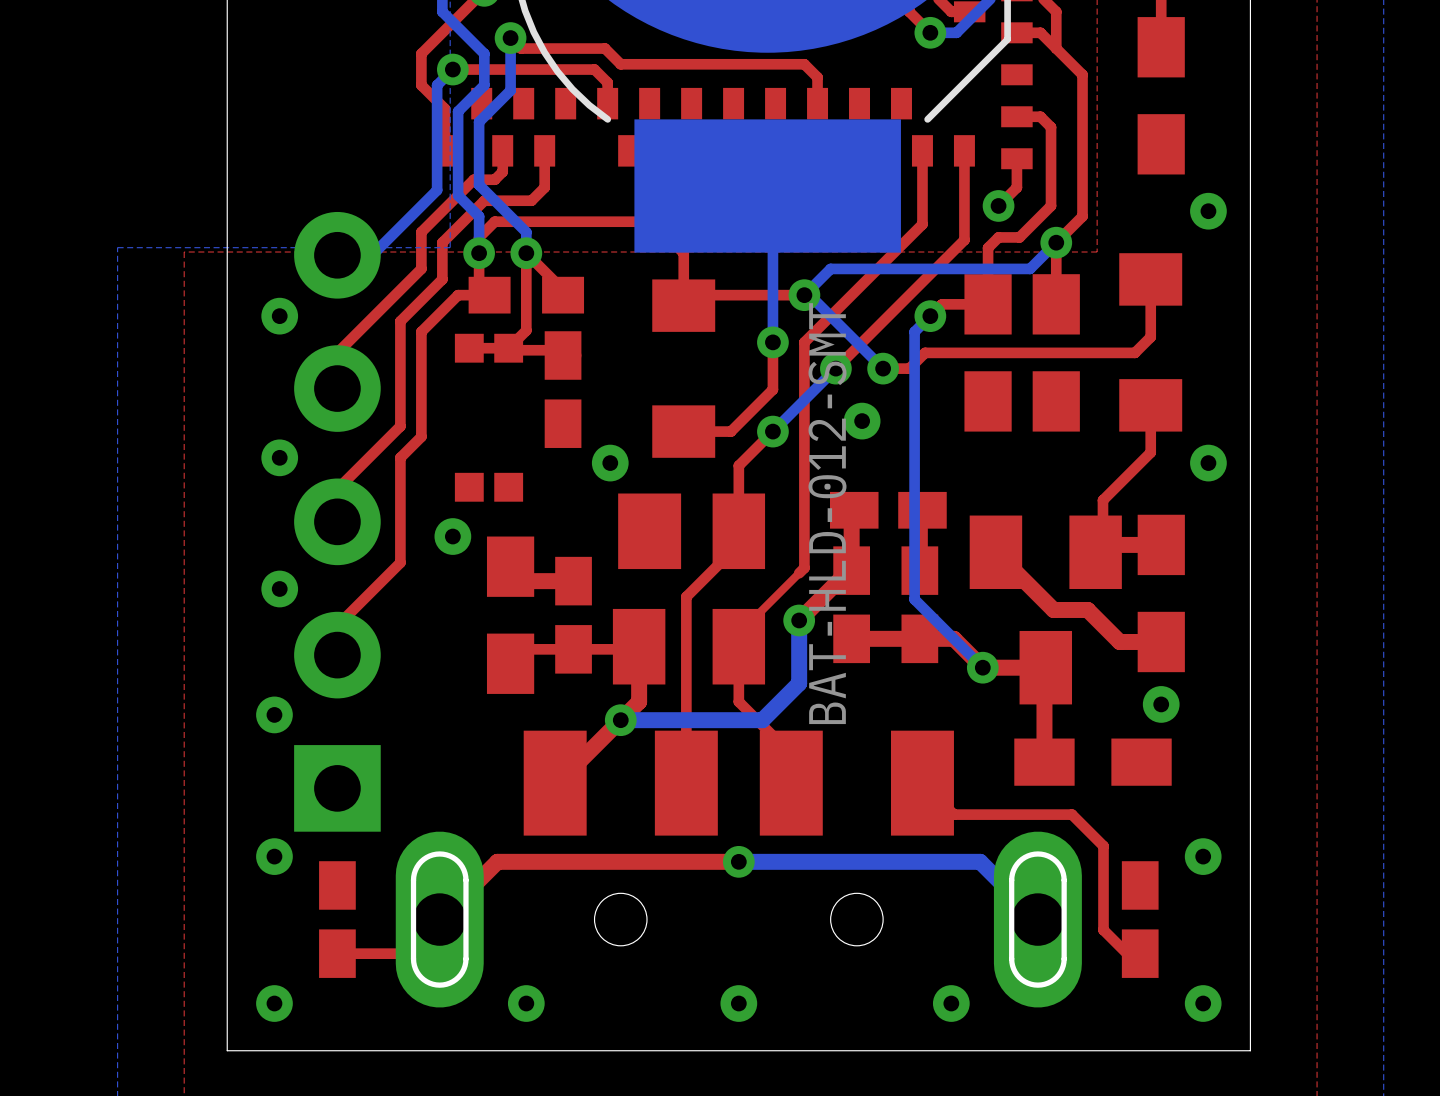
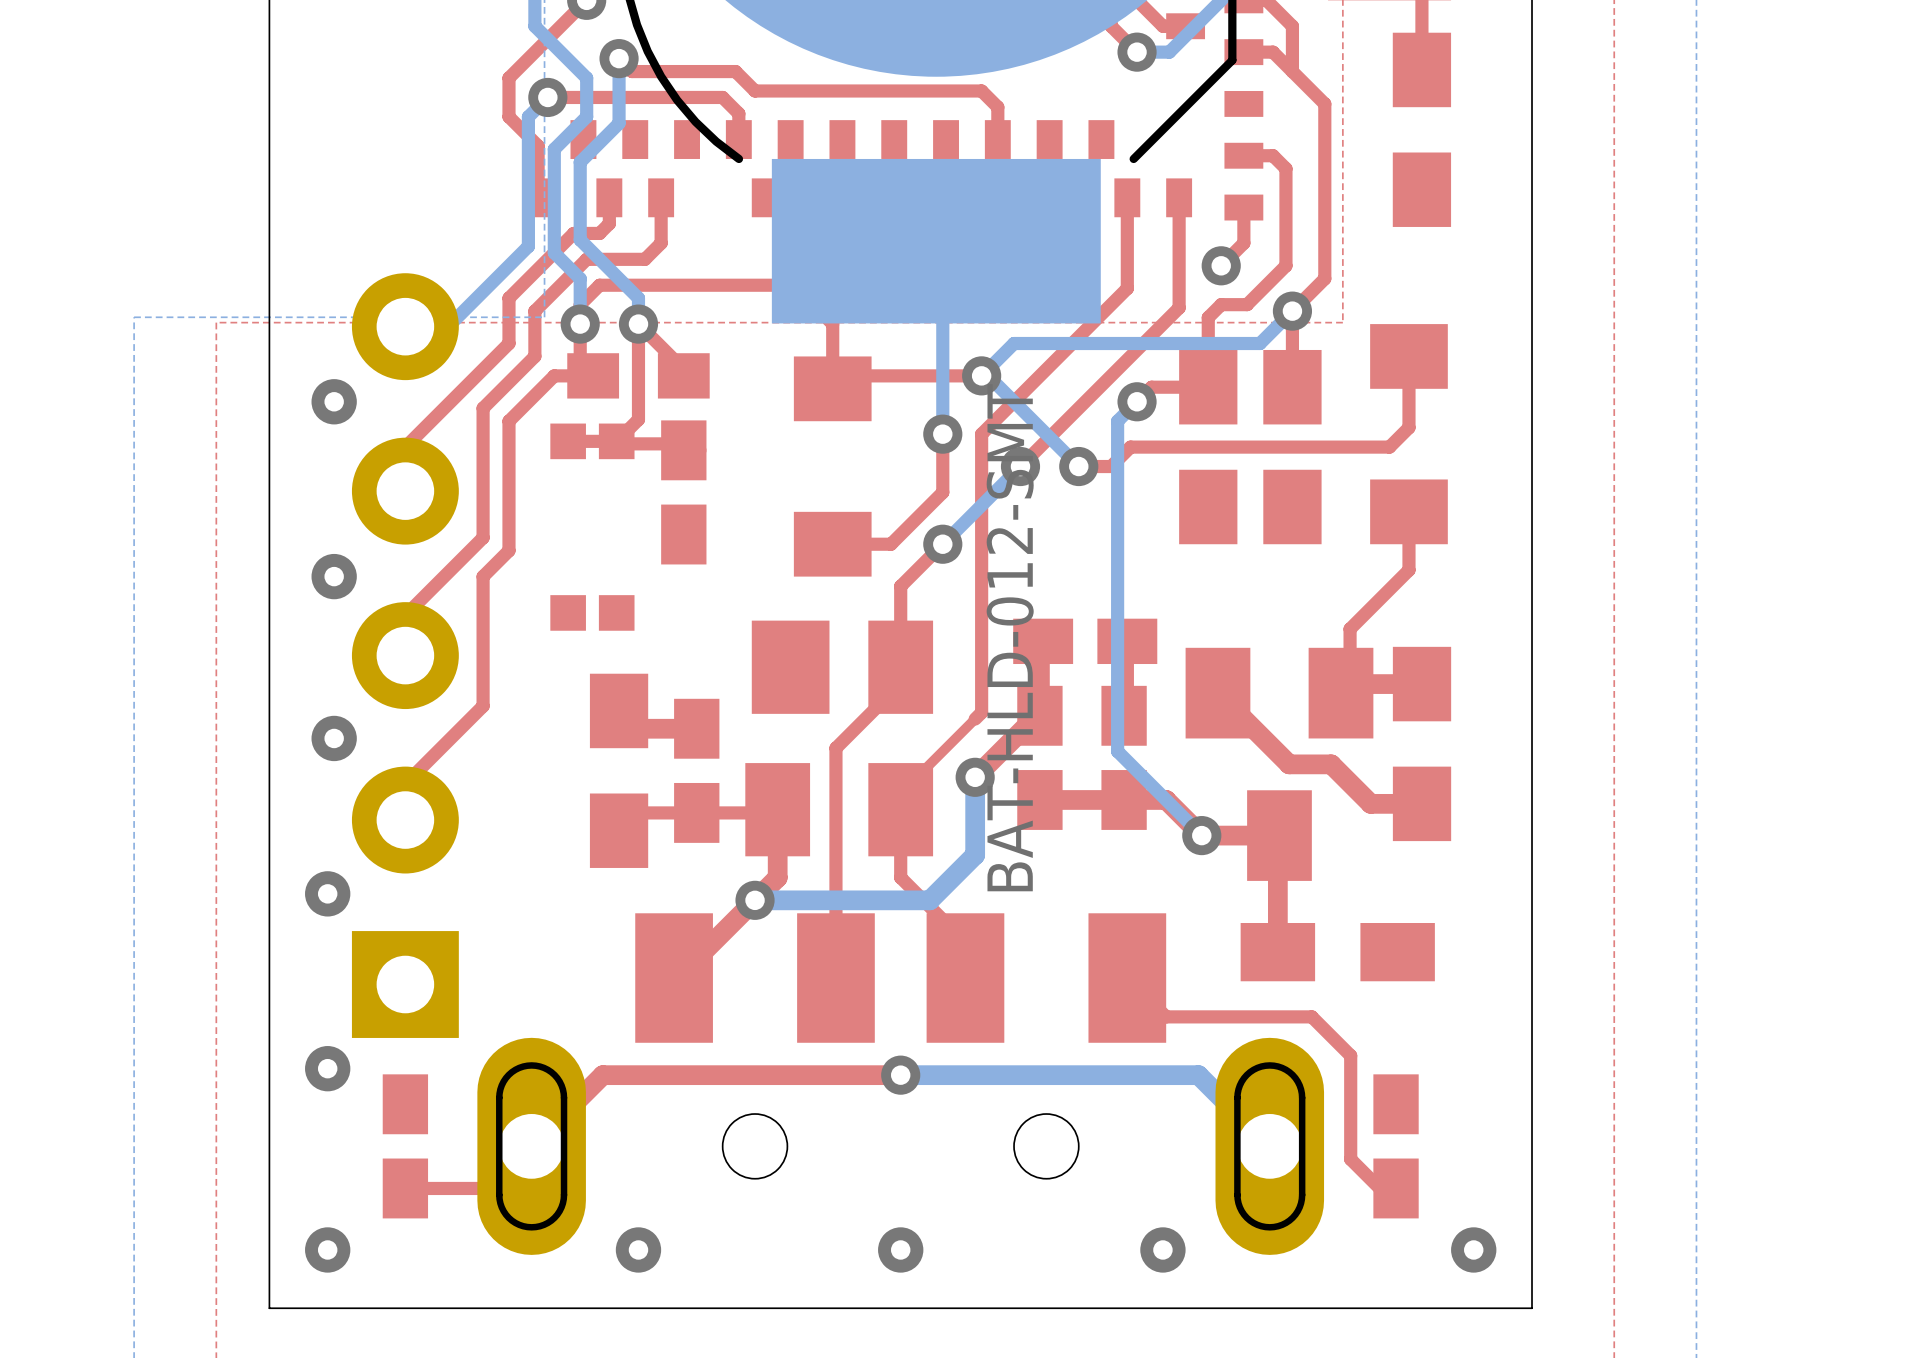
via: (1208, 211) -> none
via: (862, 421) -> none
via: (610, 463) -> none
via: (1208, 463) -> none
via: (452, 536) -> none
via: (1161, 704) -> none
via: (1203, 856) -> none

